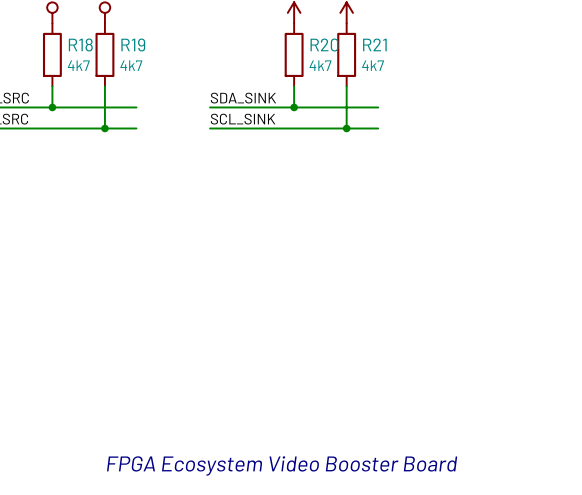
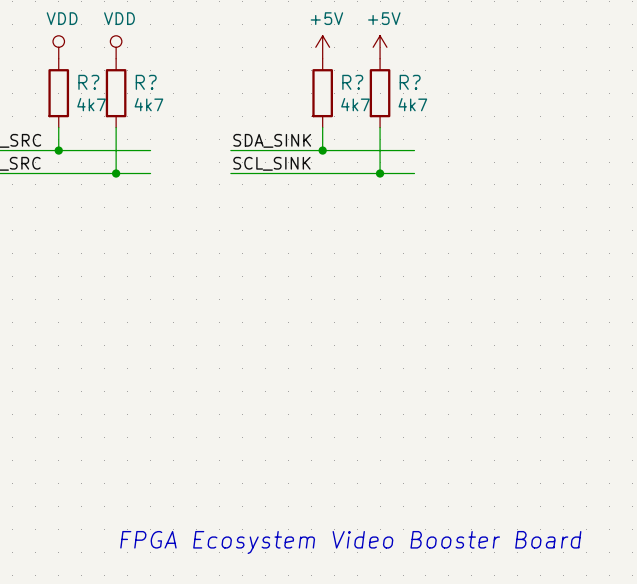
R18 name: R18 (80, 44) -> R? (88, 82)
R21 name: R21 (374, 44) -> R? (410, 82)
R19 name: R19 (133, 45) -> R? (146, 82)
R20 name: R20 (324, 45) -> R? (352, 82)

